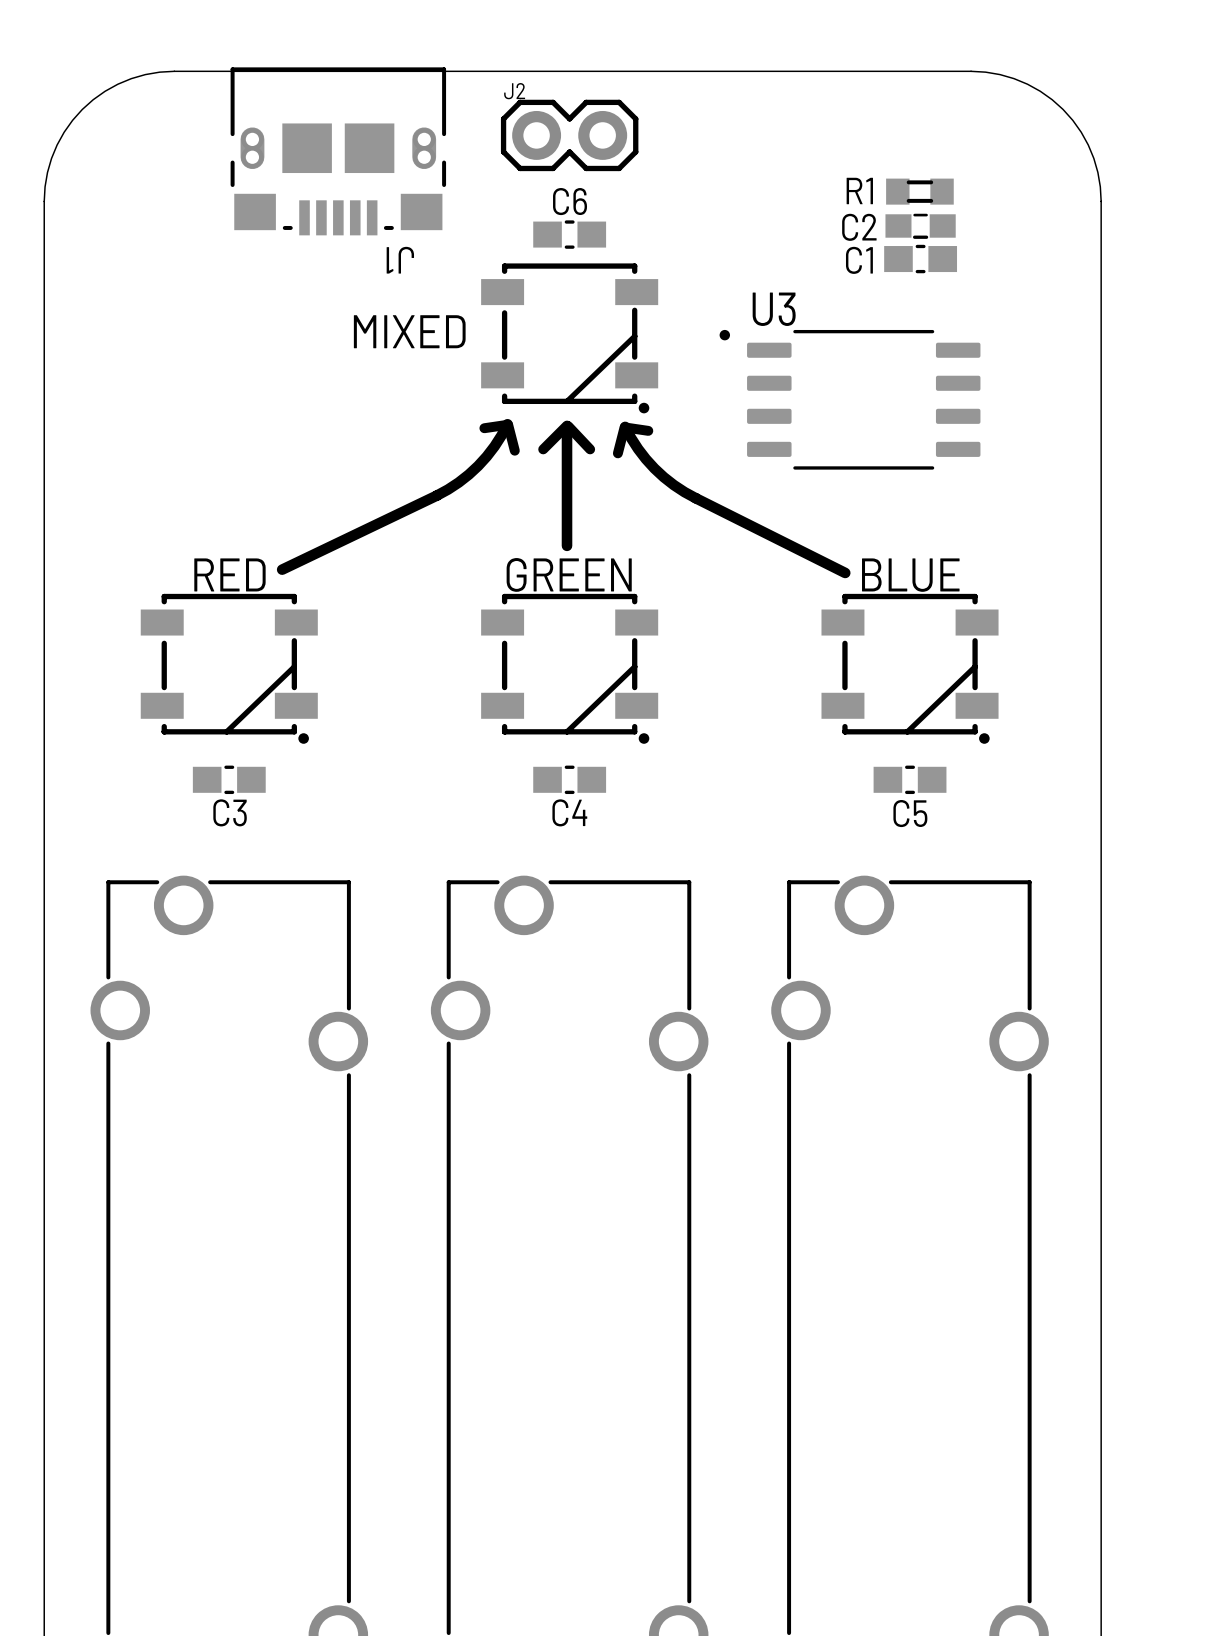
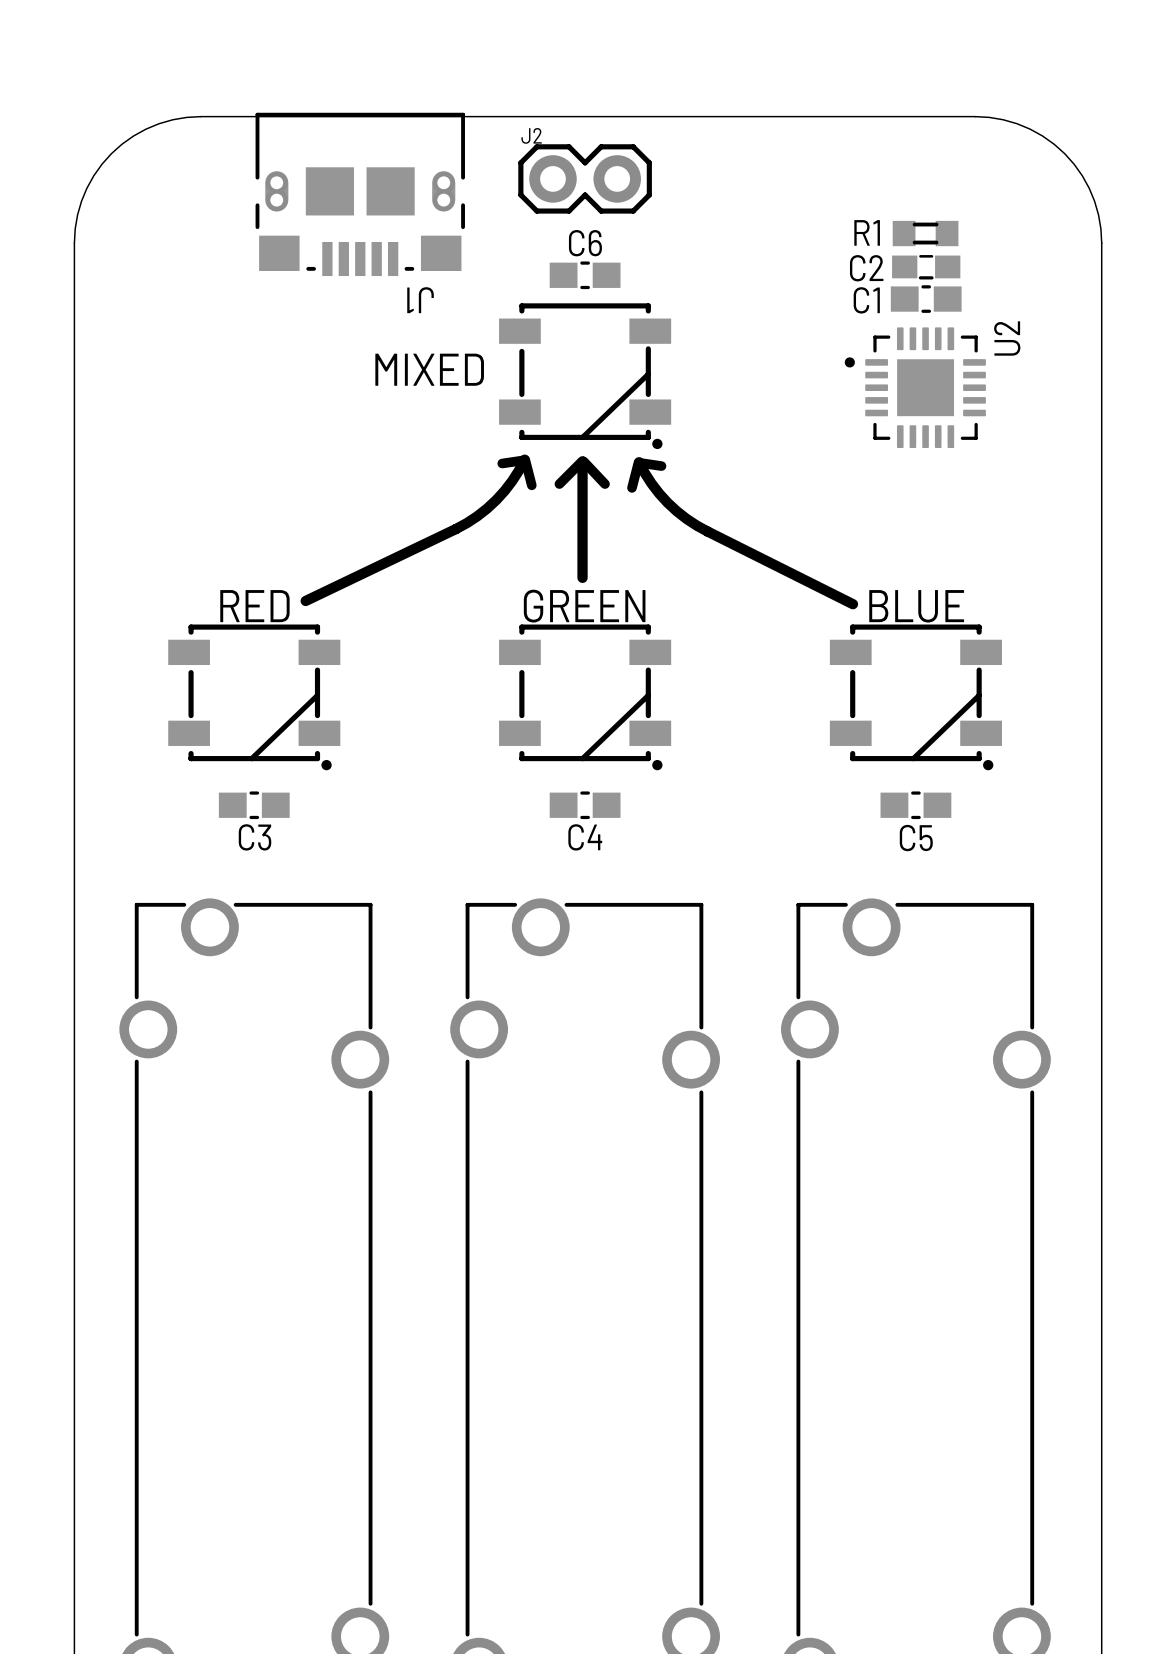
U2: none -> (915, 387)
U3: (850, 399) -> none

